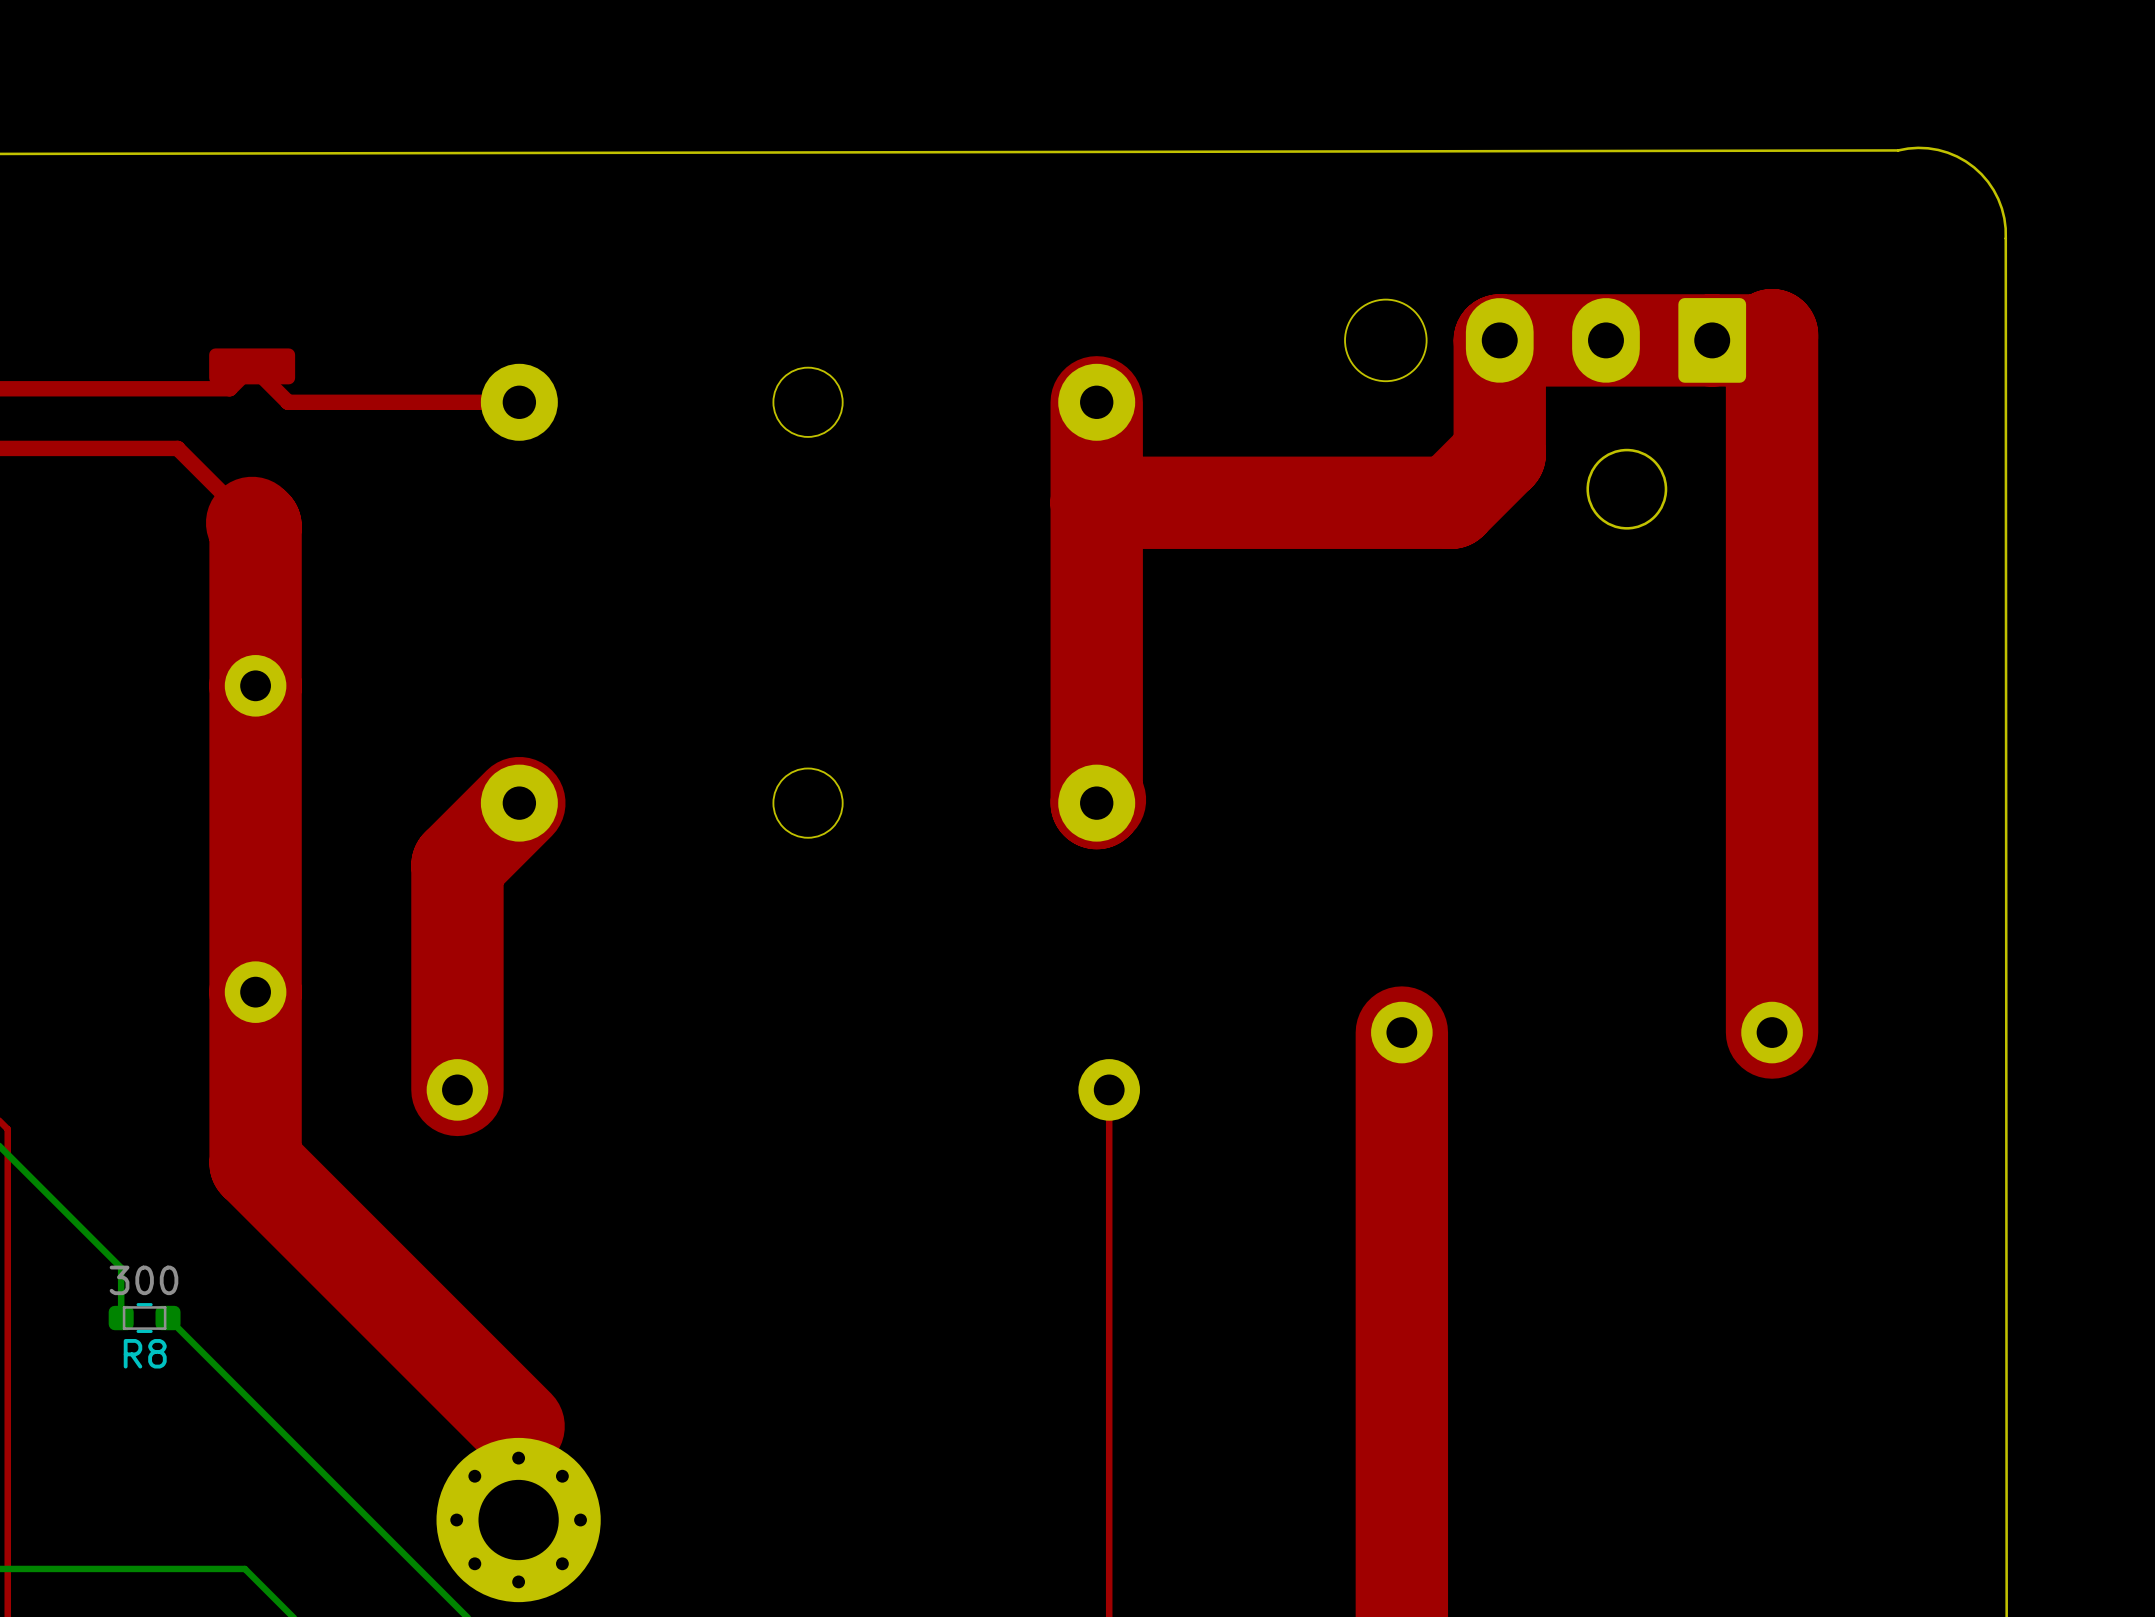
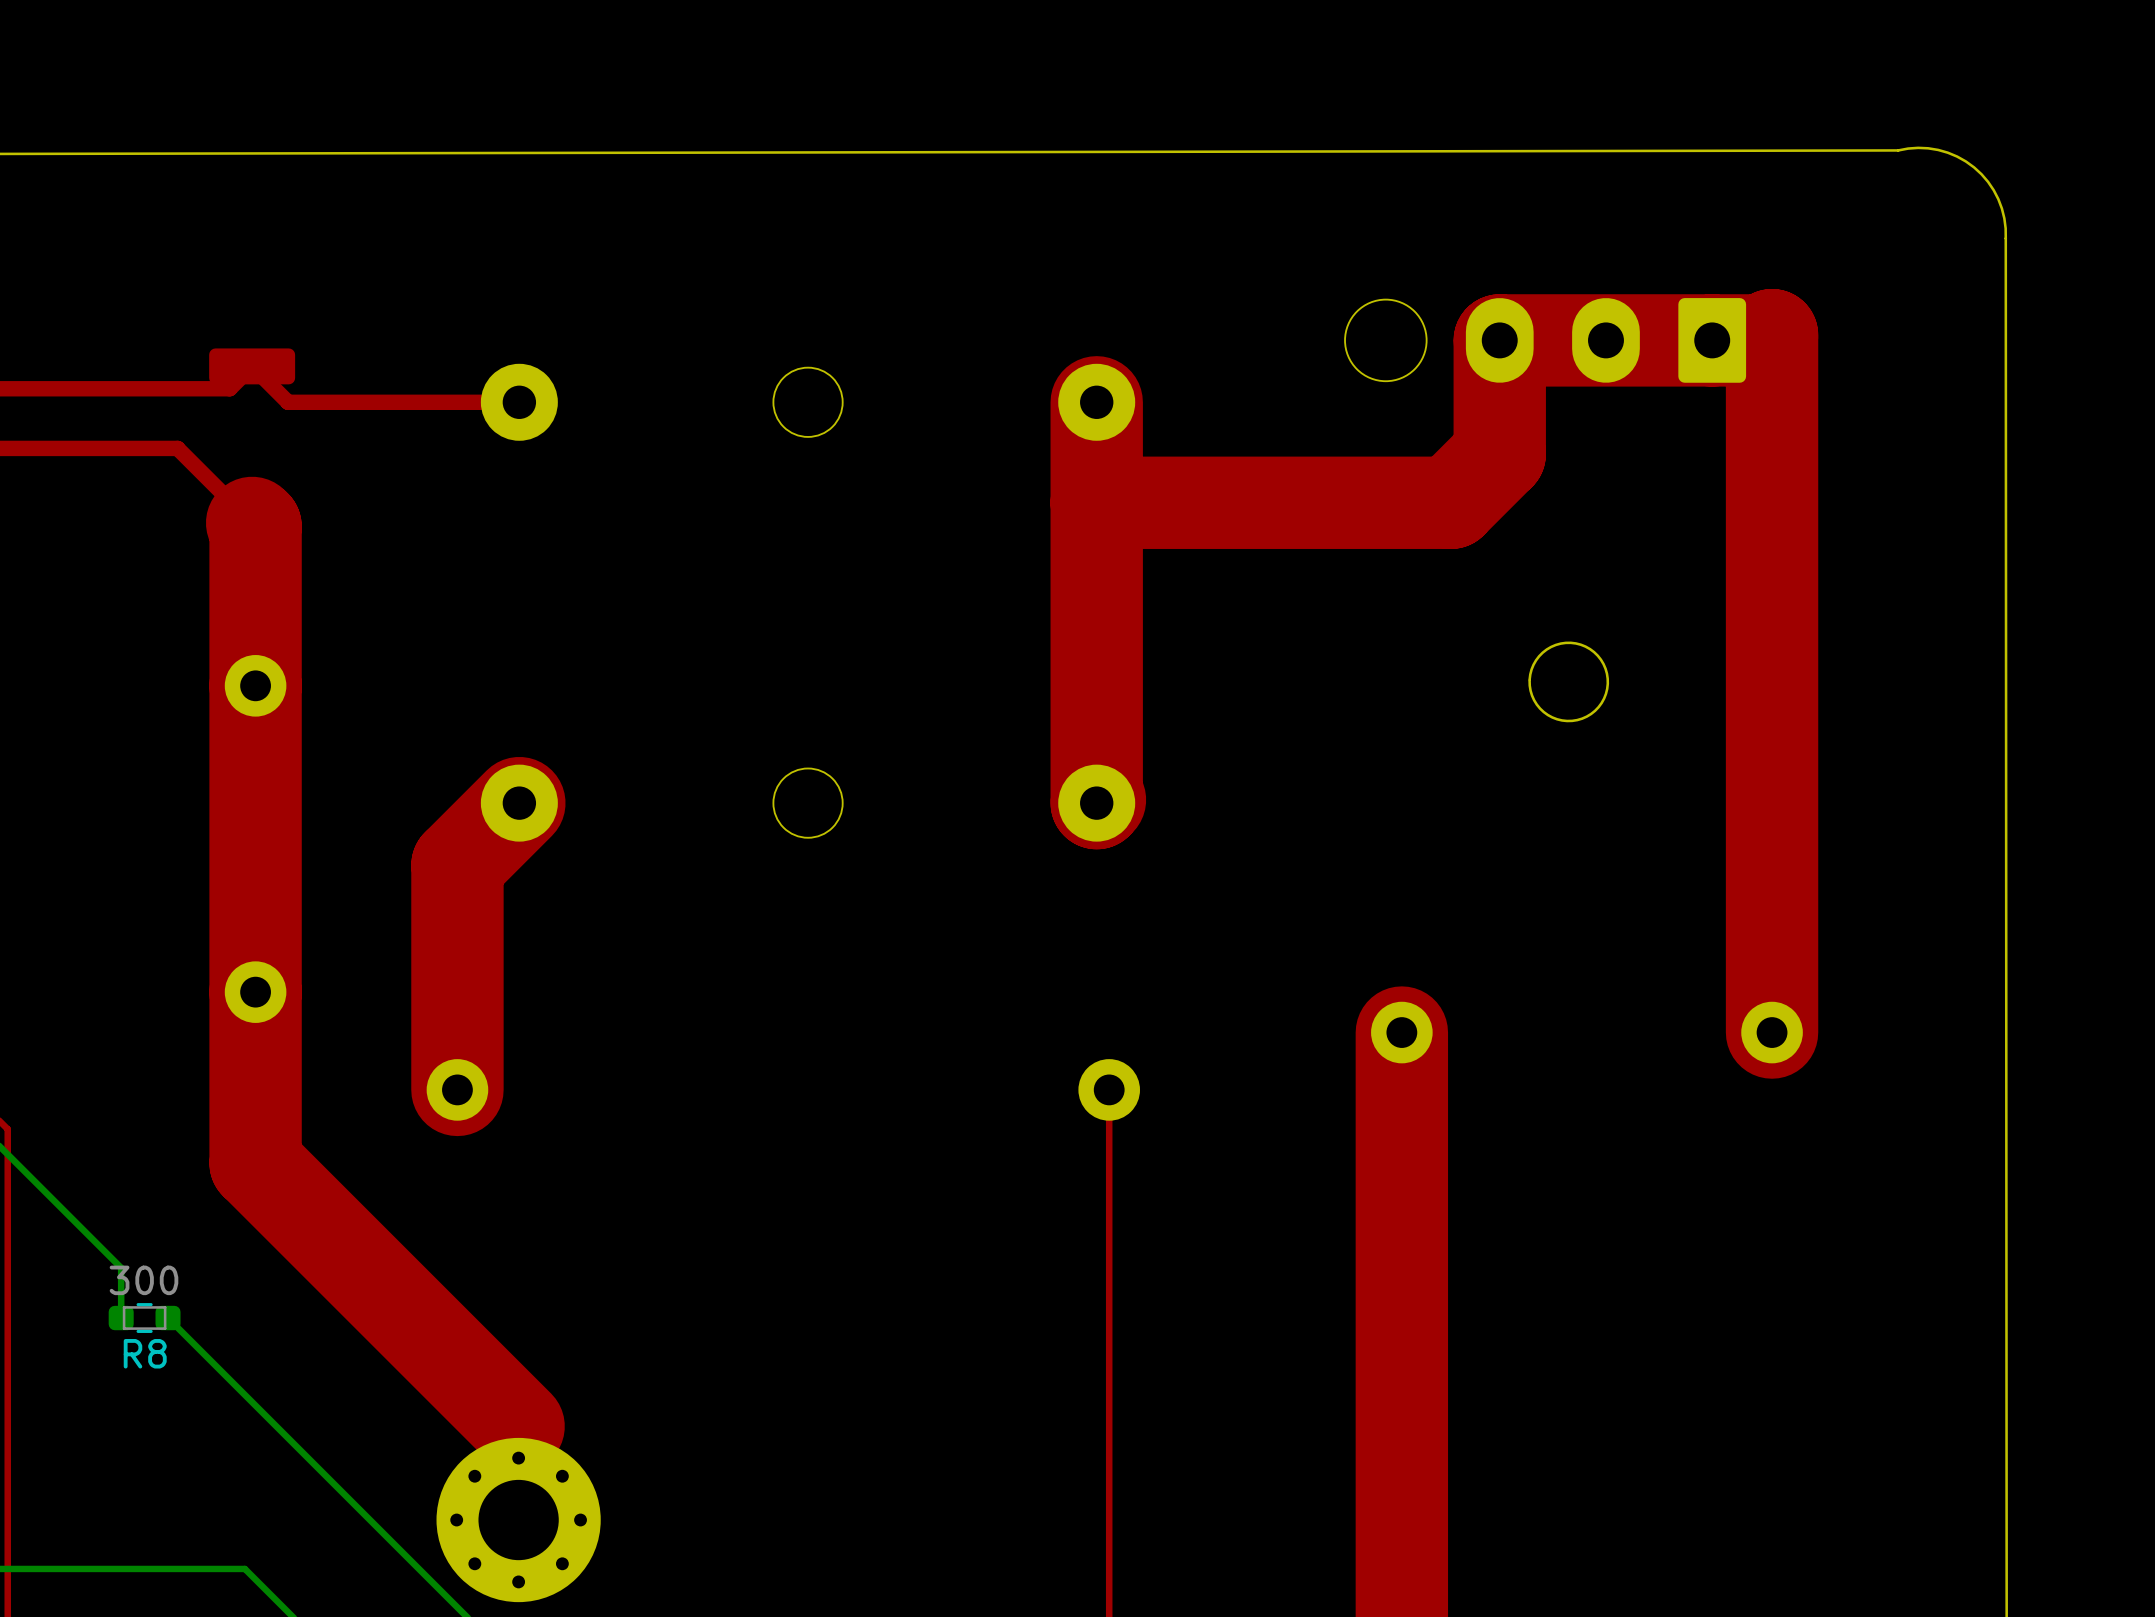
round board edge: [1586, 448, 1668, 530] -> none
board edge: none -> (1529, 679) (1533, 664) (1542, 652) (1555, 644) (1570, 642) (1585, 646) (1597, 655) (1605, 668) (1607, 683) (1604, 698) (1595, 710) (1582, 718) (1567, 721) (1552, 717) (1540, 708) (1532, 695) (1529, 680)

